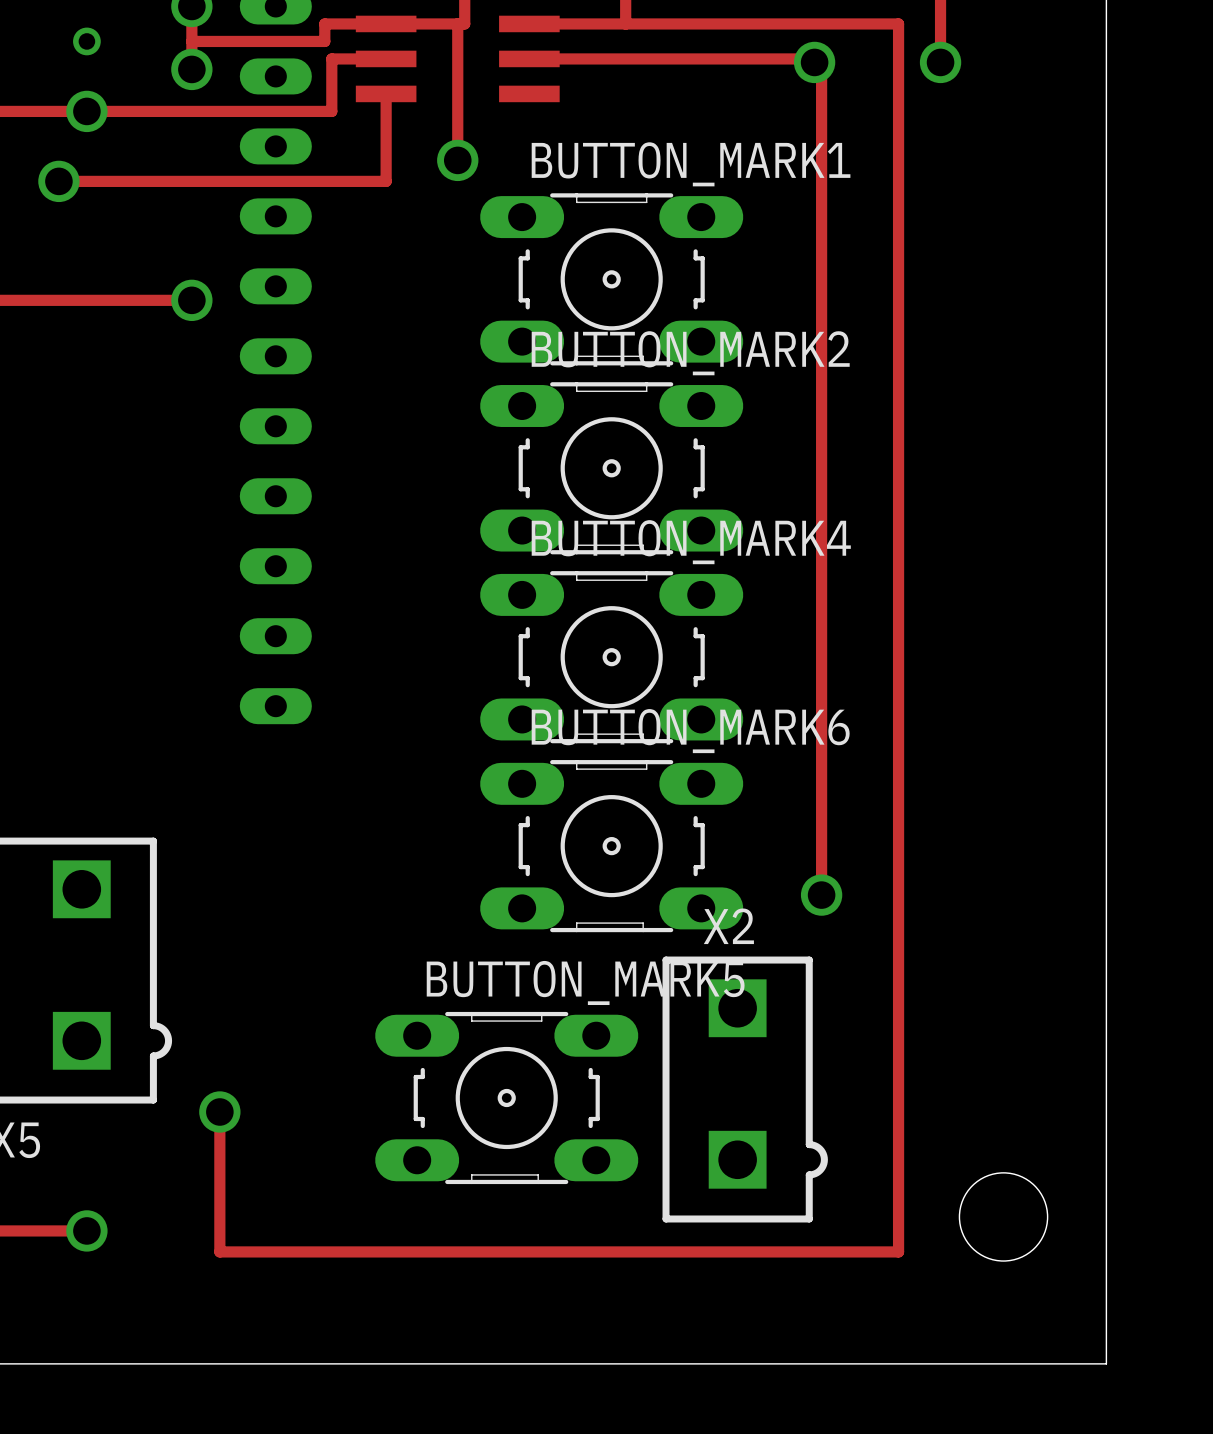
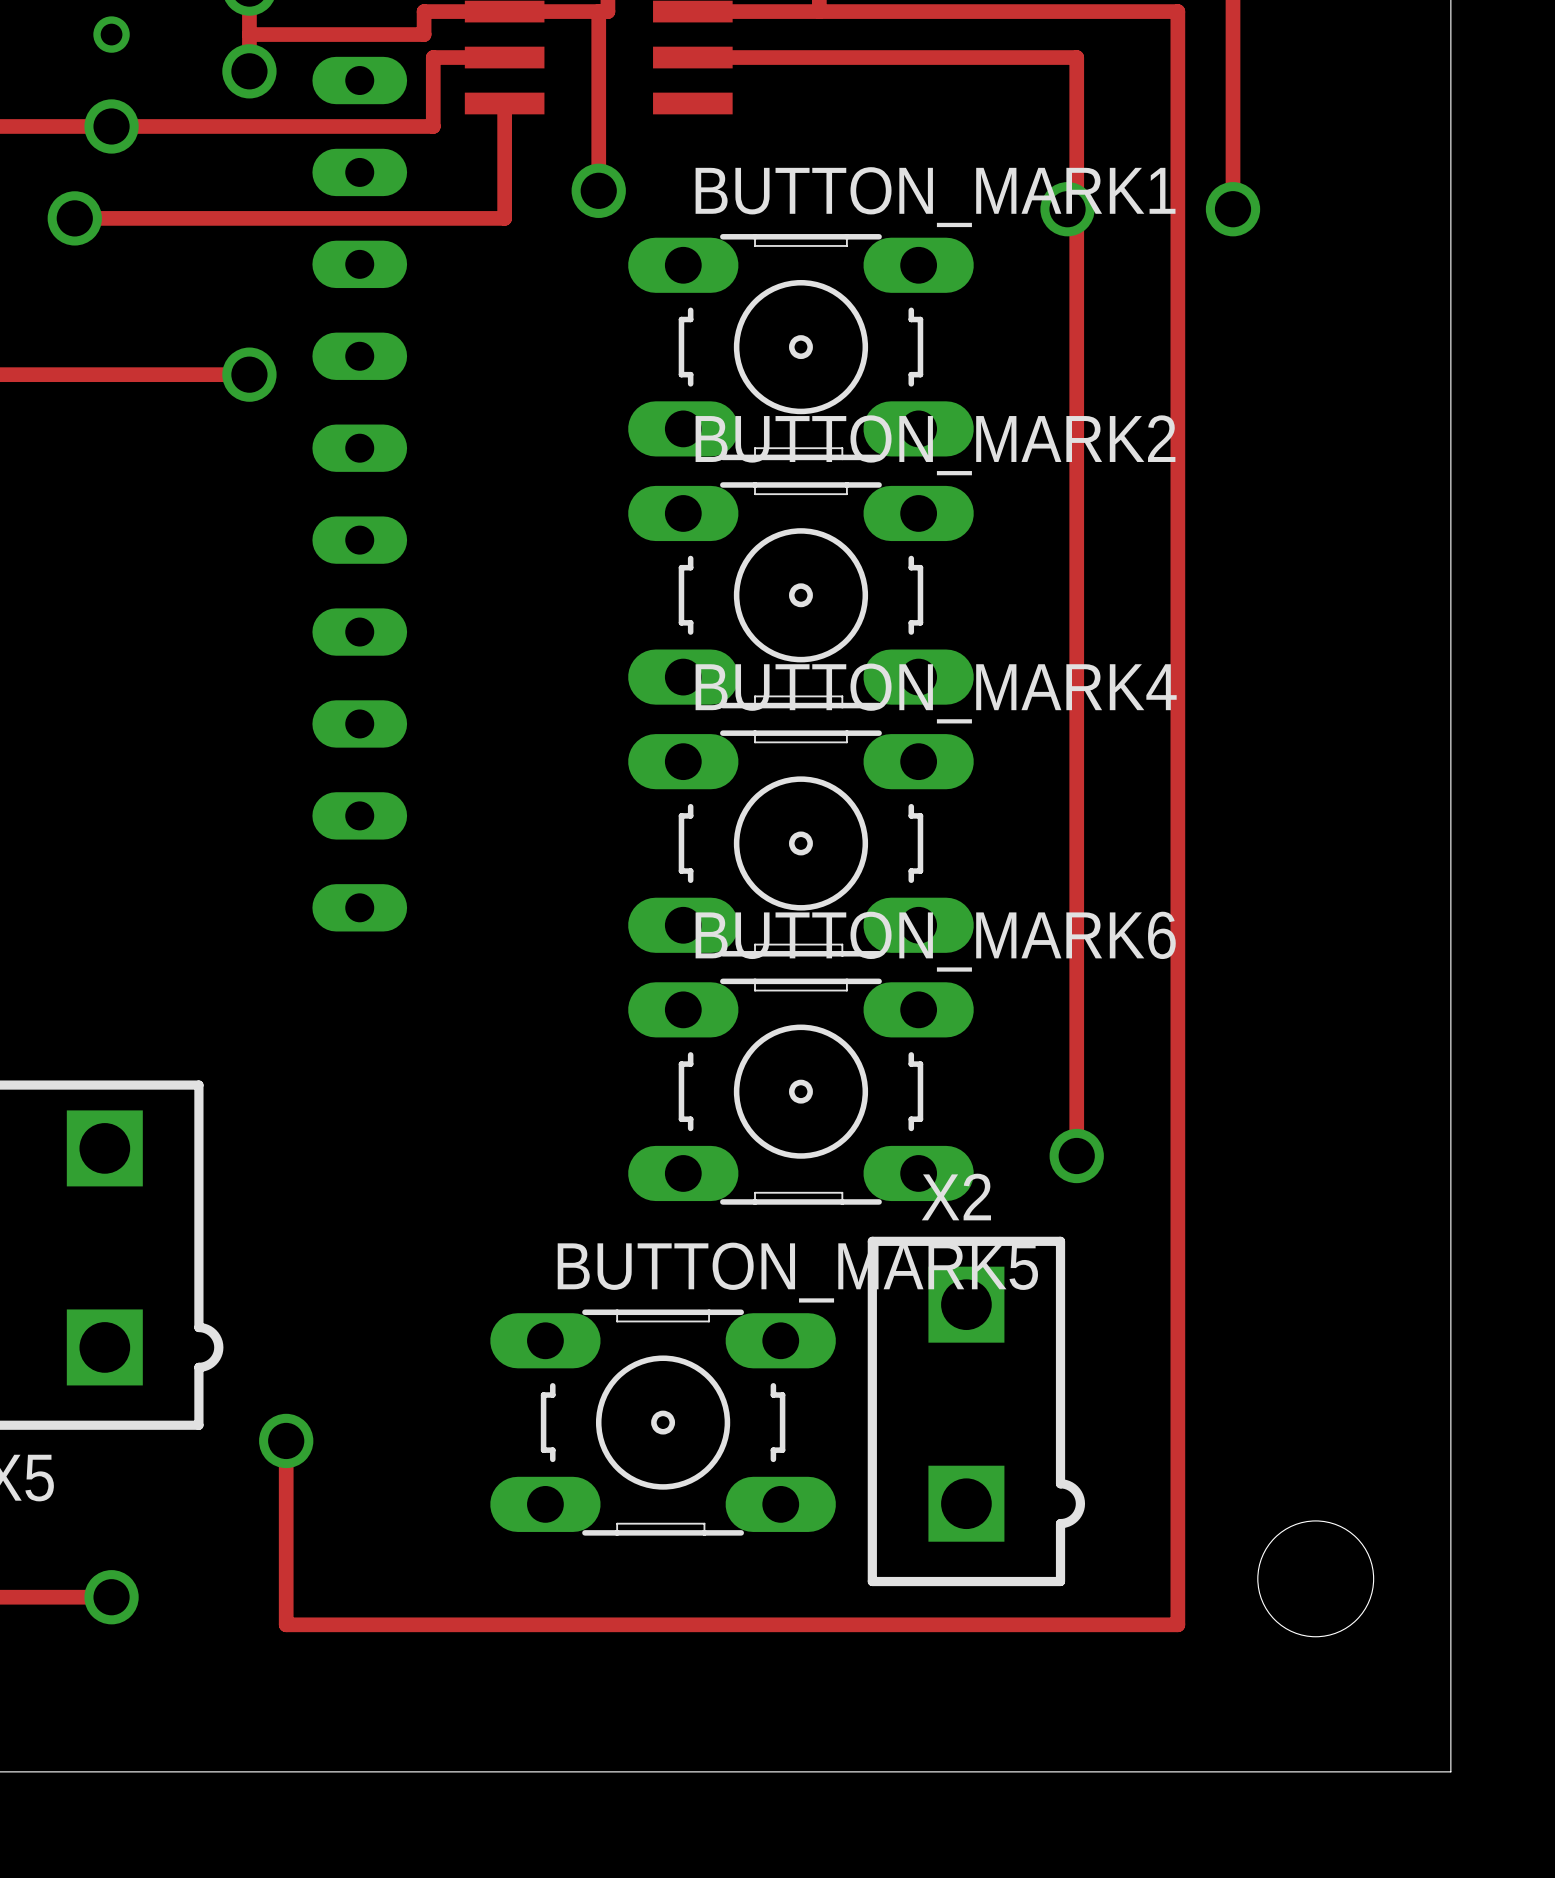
via: (814, 62) -> none
track: none -> (1233, 62) (1233, 209)
via: (940, 62) -> none
via: none -> (1067, 209)
via: none -> (1233, 209)

